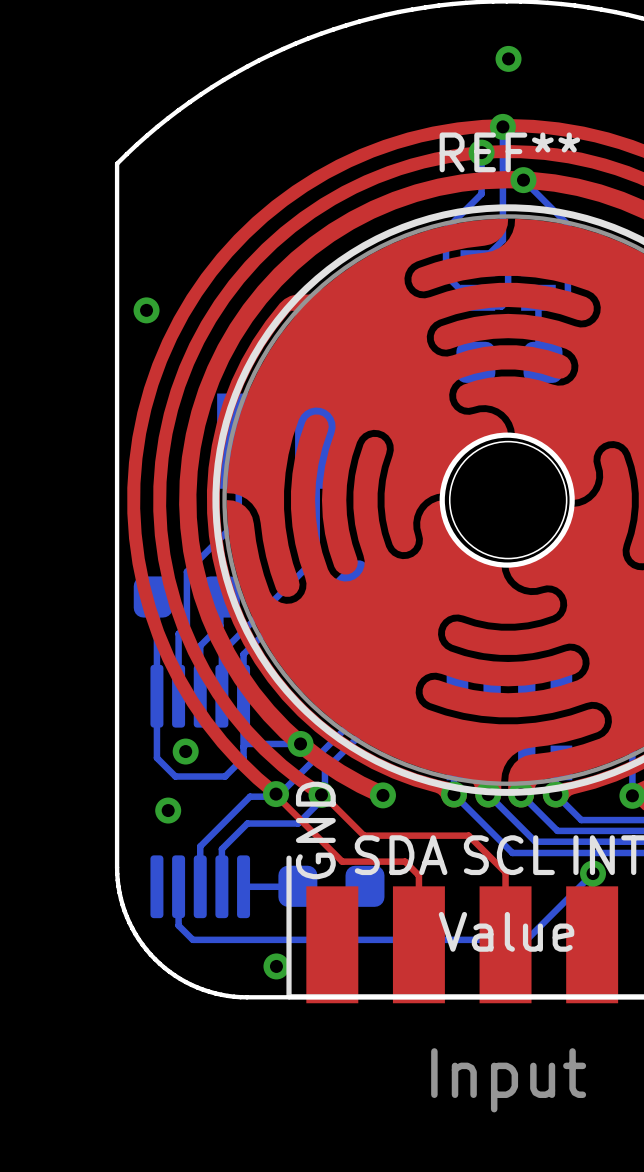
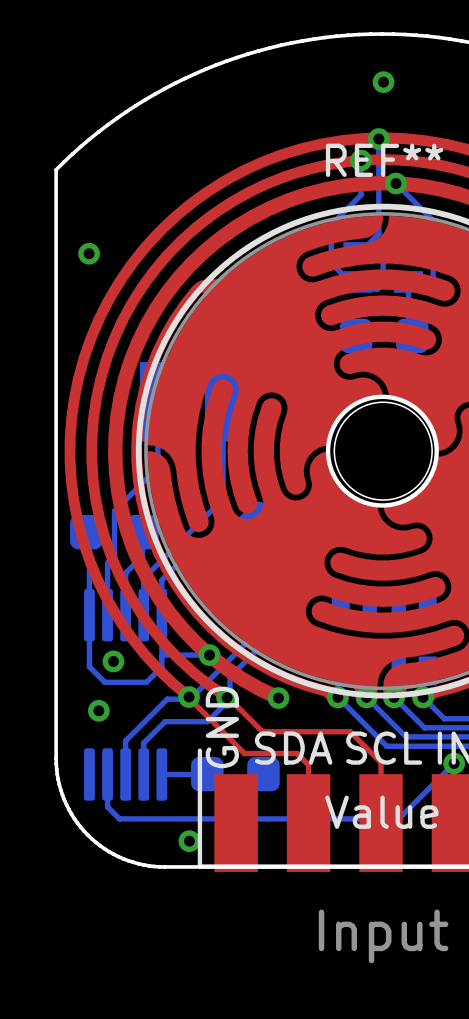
via position: (146, 310) -> (89, 253)

